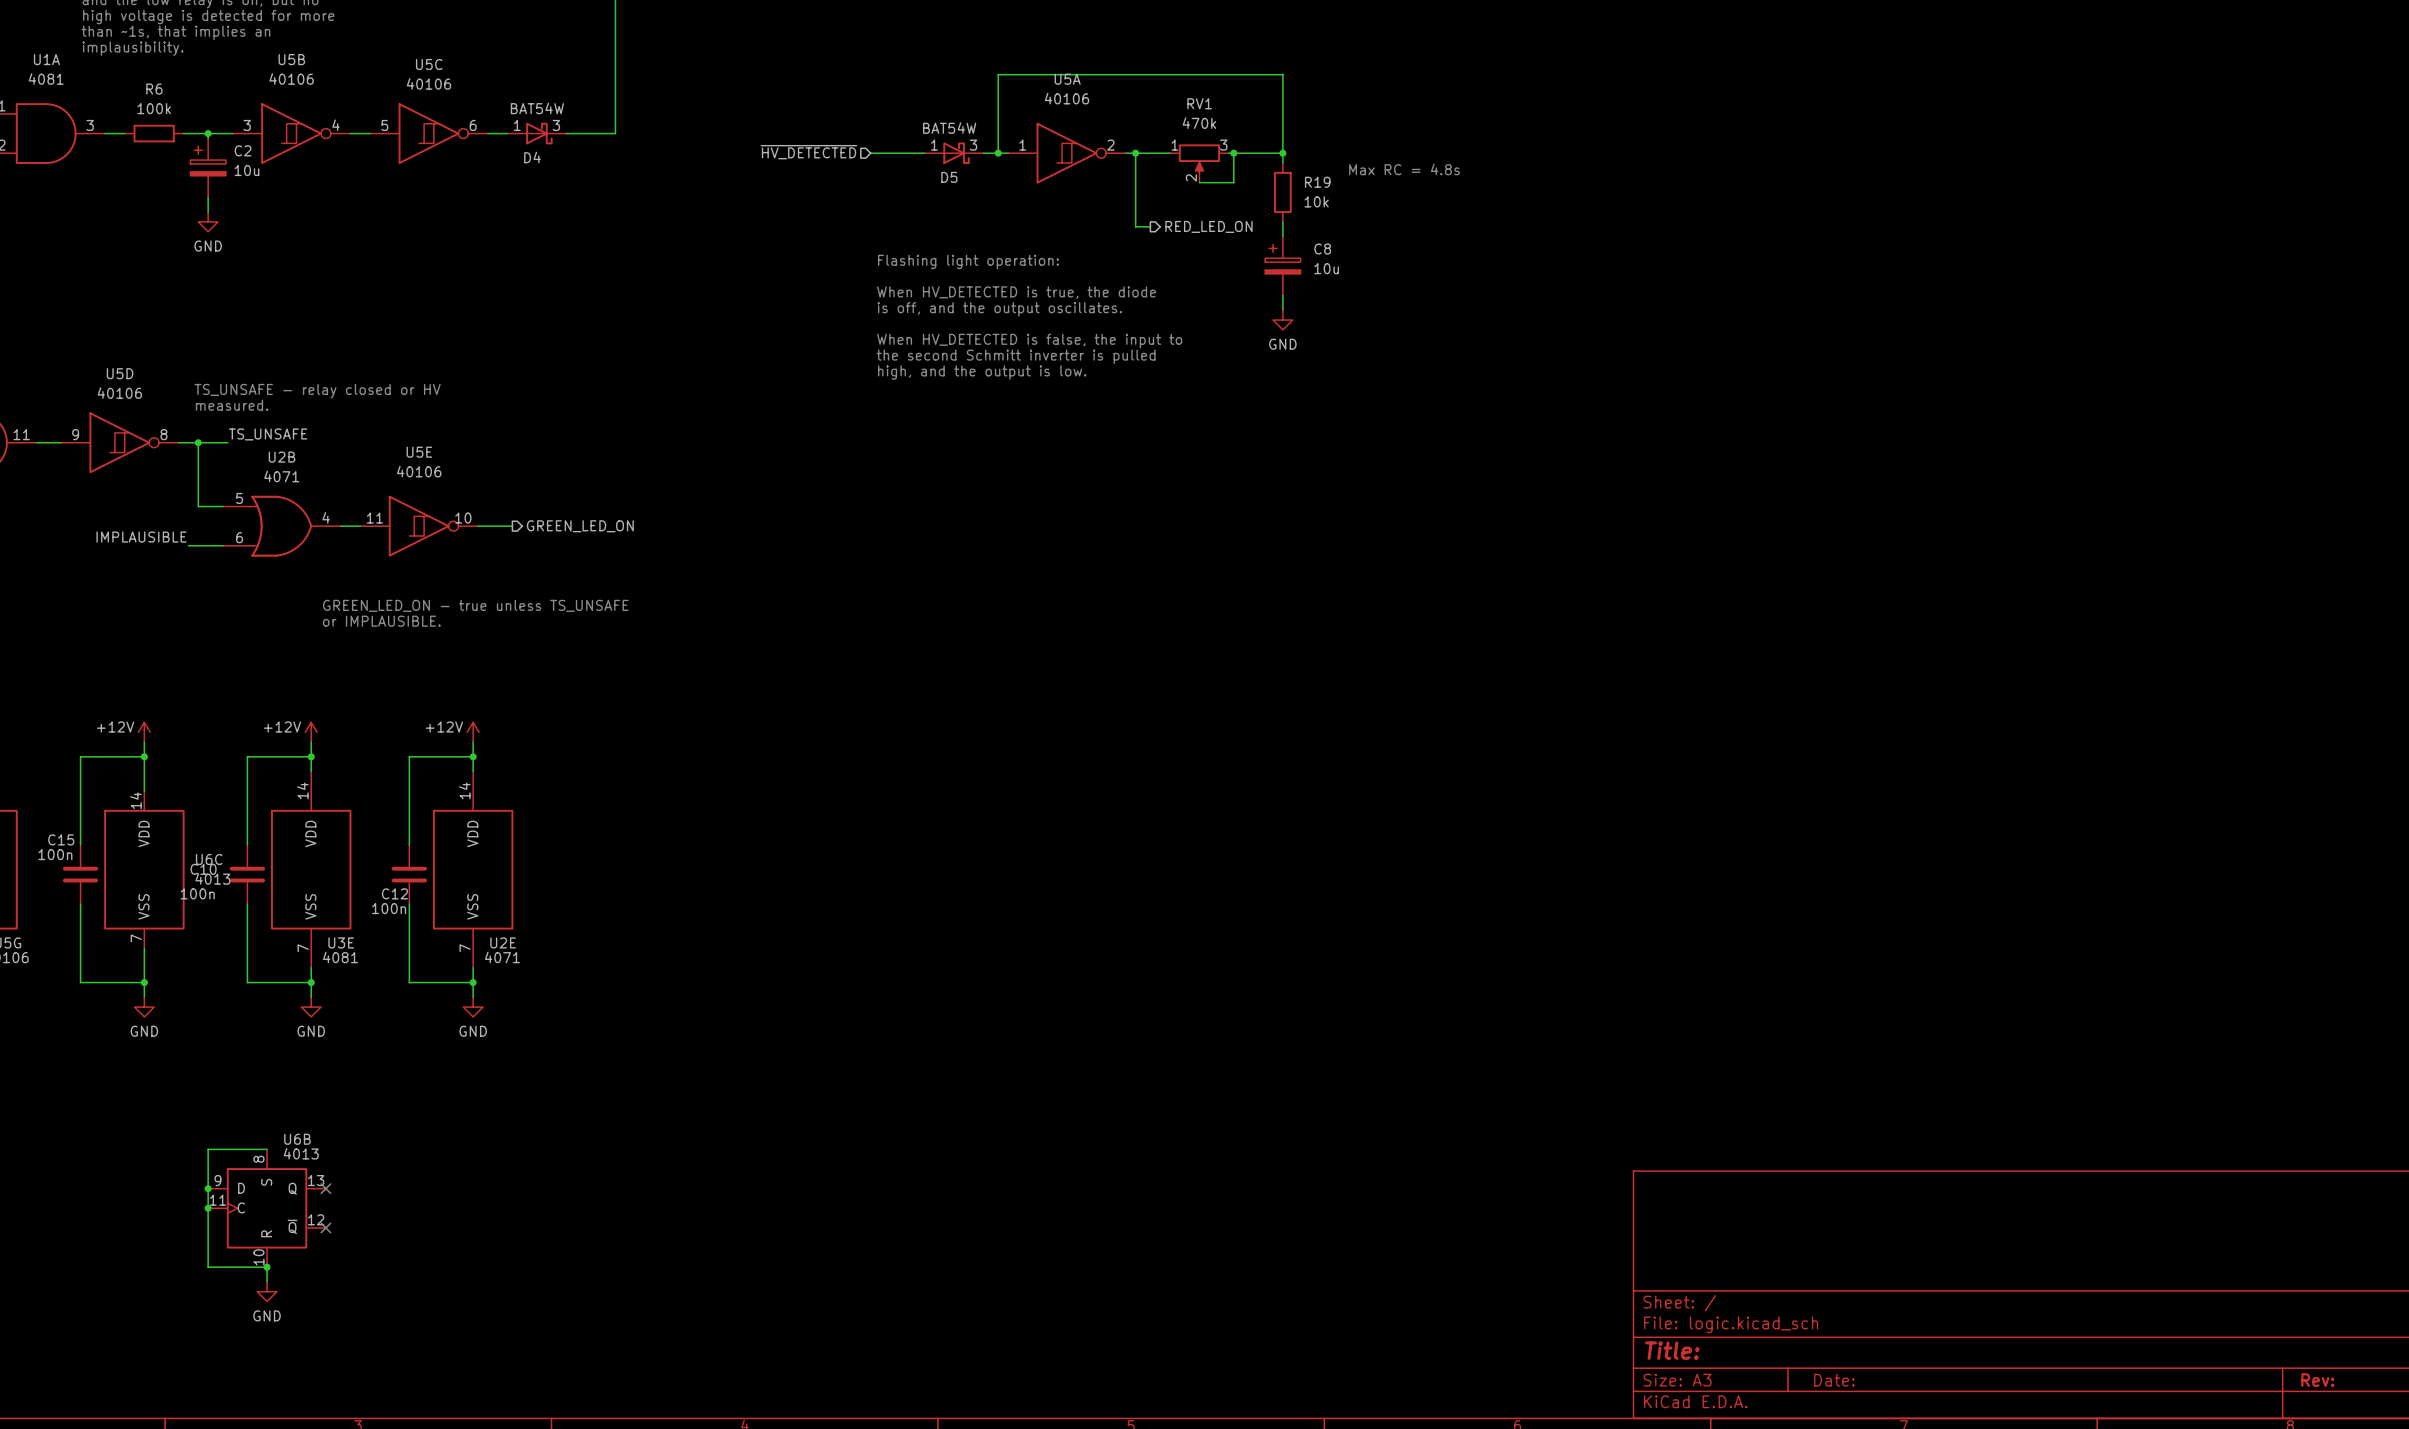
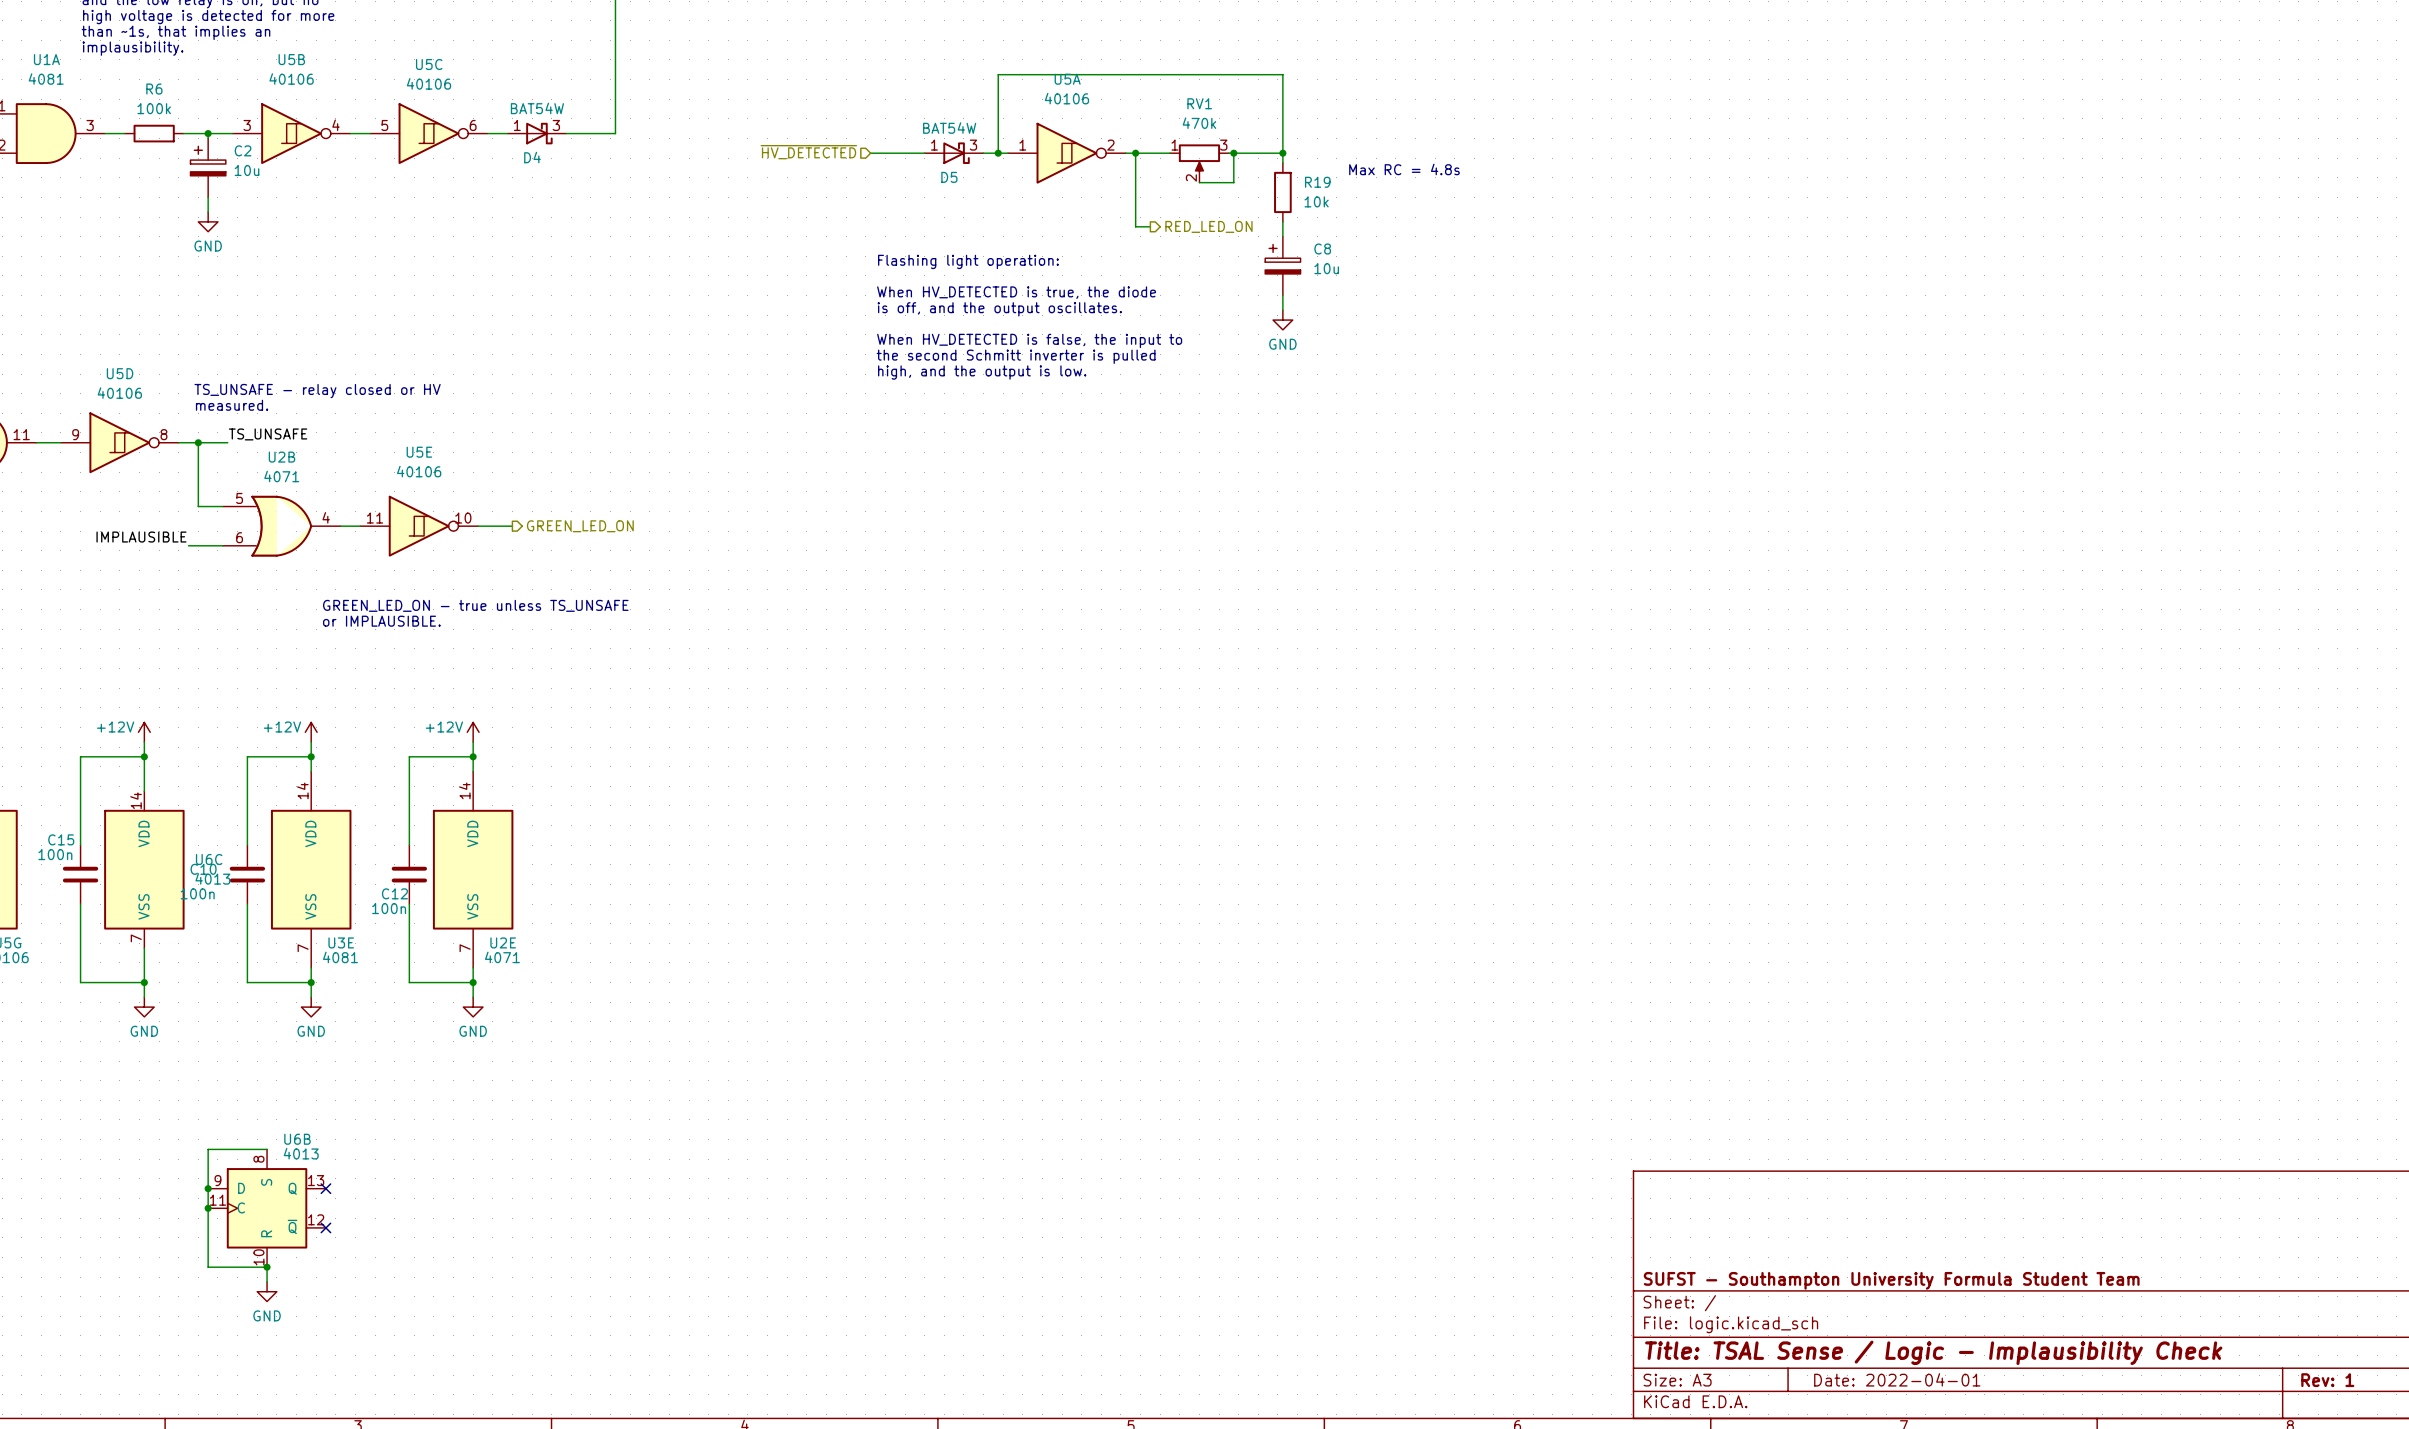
title block: none -> SUFST - Southampton University Formula Student Team (1891, 1280)
title block: Title: (1672, 1350) -> Title: TSAL Sense / Logic - Implausibility Check (1933, 1352)
title block: Date: (1834, 1380) -> Date: 2022-04-01 (1897, 1379)
title block: Rev: (2317, 1380) -> Rev: 1 (2327, 1380)

